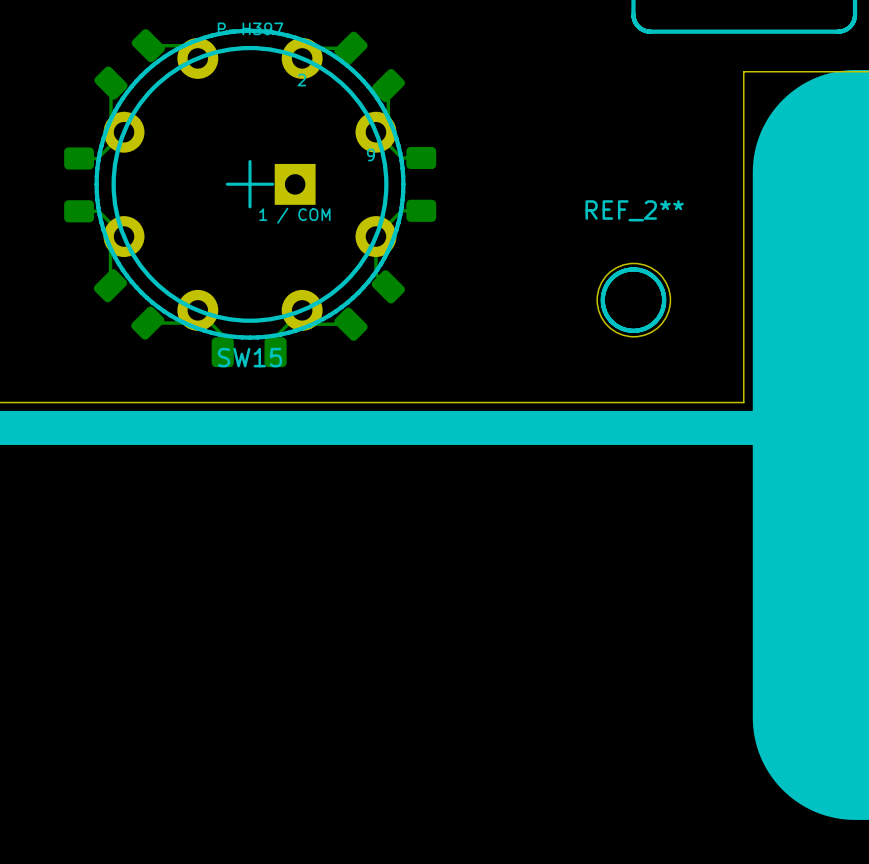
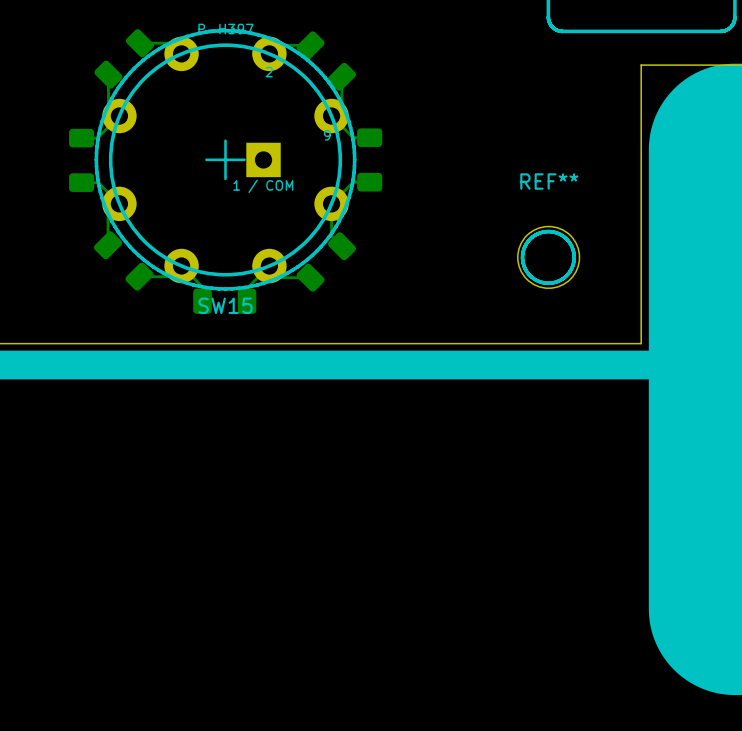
REF_2** name: REF_2** (634, 210) -> REF** (549, 181)

